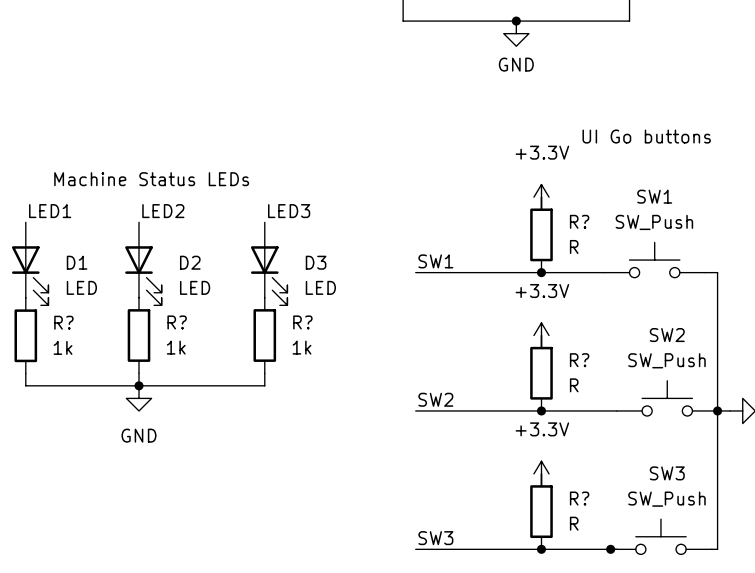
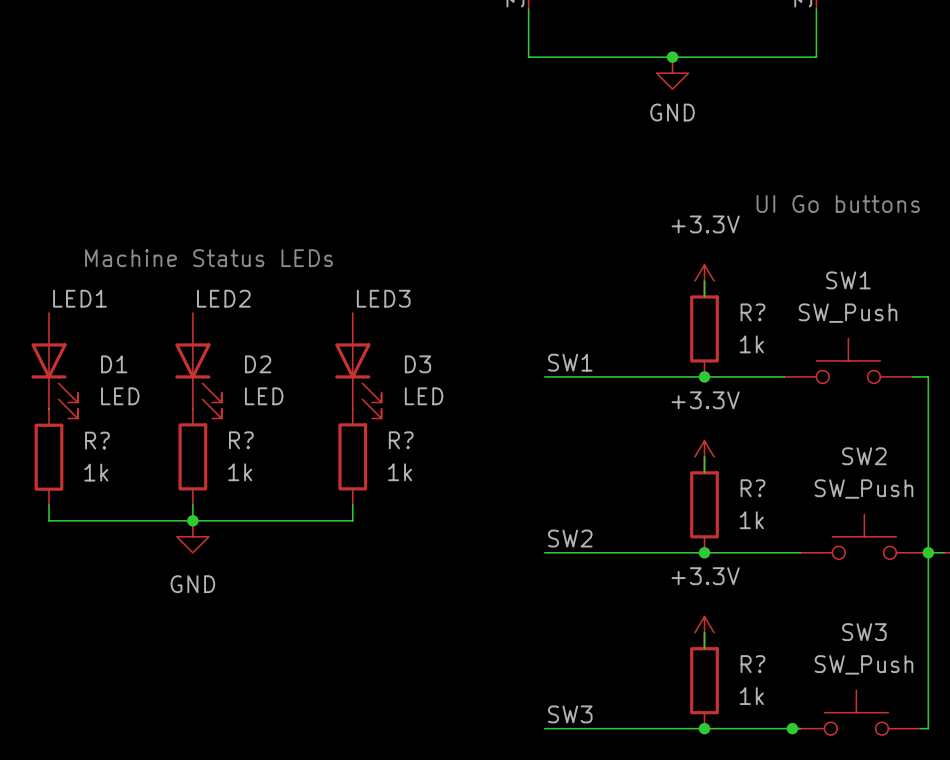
R? value: R (574, 247) -> 1k (751, 344)
R? value: R (574, 385) -> 1k (751, 520)
R? value: R (574, 523) -> 1k (751, 696)

